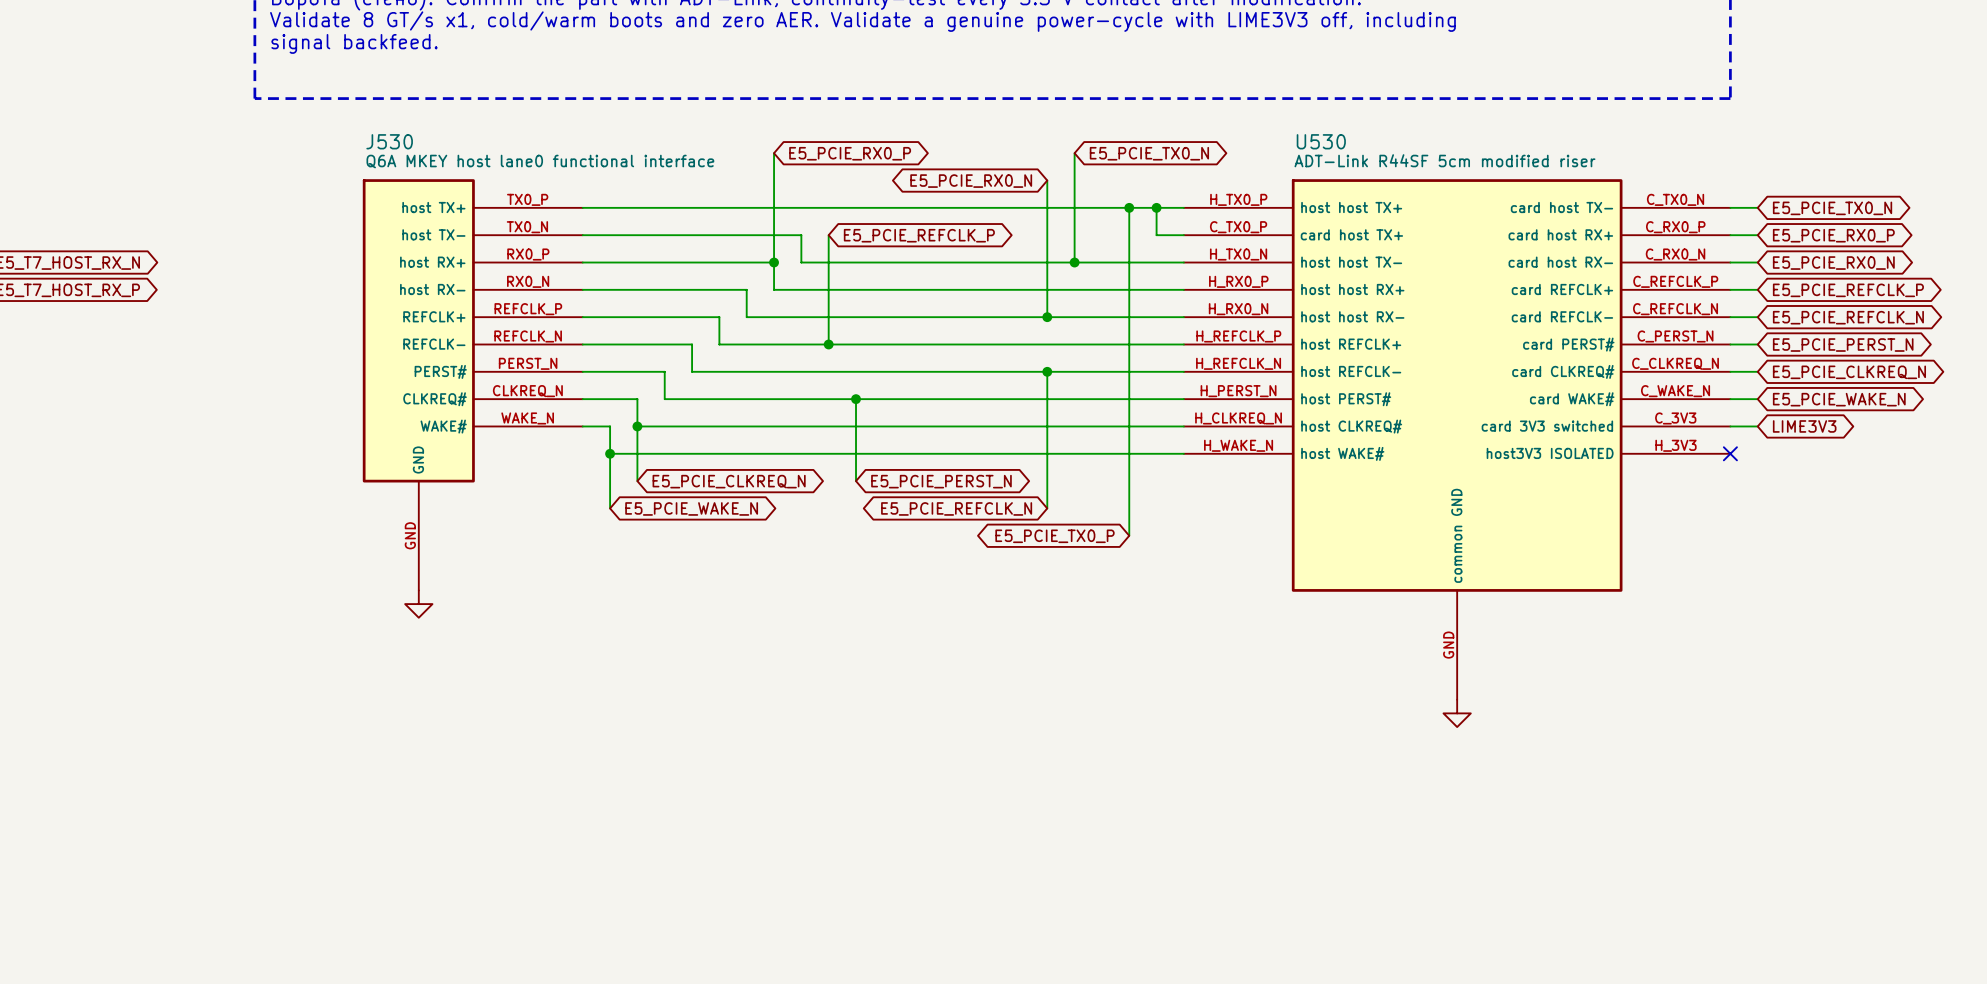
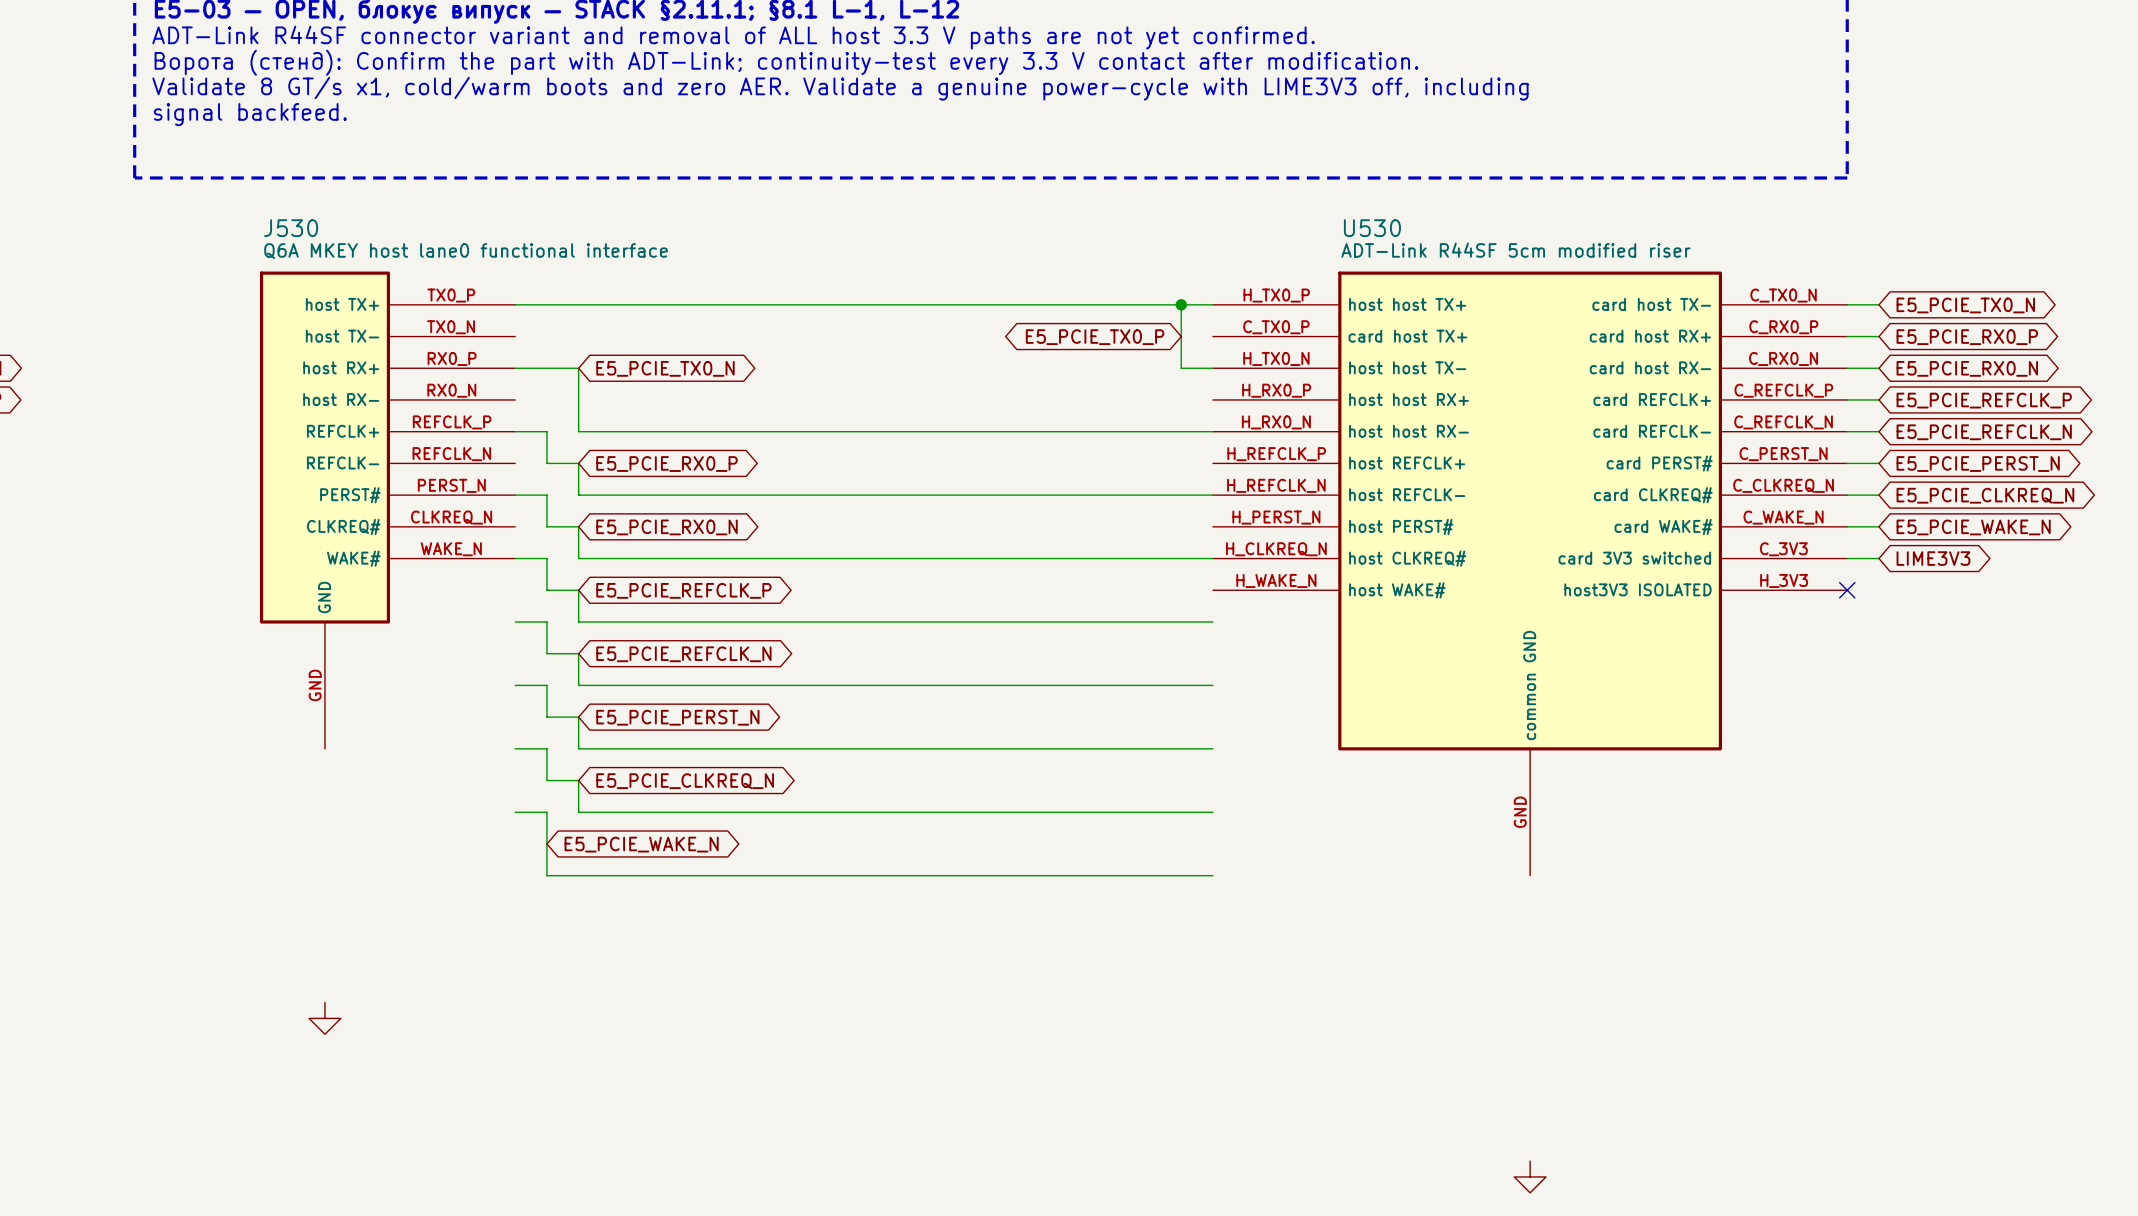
wire: (774, 153) (774, 289) (1183, 289) -> none
global label position: E5_PCIE_RX0_P (850, 153) -> E5_PCIE_RX0_P (667, 464)
wire: (1074, 153) (1074, 262) -> none
global label: E5_PCIE_TX0_N (1149, 153) -> none
wire: (1047, 180) (1047, 317) -> none
global label: E5_PCIE_RX0_N (971, 181) -> none
wire: (1129, 207) (1129, 535) -> none
junction: (1129, 207) -> none
wire: (582, 235) (801, 235) (801, 262) (1156, 262) -> none
wire: (828, 235) (828, 344) -> none
global label: E5_PCIE_REFCLK_P (919, 235) -> none
global label: none -> E5_PCIE_TX0_P (1095, 337)
wire: (1156, 235) (1183, 235) -> (1181, 336) (1181, 368)
wire: (637, 262) (774, 262) -> (578, 368) (578, 431)
junction: (774, 262) -> none
junction: (1074, 262) -> none
global label: none -> E5_PCIE_TX0_N (665, 368)
wire: (582, 289) (746, 289) (746, 317) -> (673, 431) (705, 431)
wire: (610, 317) (637, 317) -> (546, 431) (546, 463)
wire: (719, 317) (719, 344) (1183, 344) -> none
junction: (1047, 317) -> none
wire: (582, 344) (610, 344) -> none
wire: (637, 344) (692, 344) (692, 371) -> (610, 495) (642, 495)
junction: (828, 344) -> none
wire: (610, 371) (637, 371) -> (578, 463) (578, 495)
wire: (664, 371) (664, 399) (1183, 399) -> none
wire: (1047, 371) (1047, 508) -> none
junction: (1047, 371) -> none
wire: (582, 399) (610, 399) -> (546, 495) (546, 526)
global label: none -> E5_PCIE_RX0_N (667, 527)
wire: (856, 399) (856, 481) -> none
junction: (856, 399) -> none
wire: (637, 426) (637, 453) (1183, 453) -> none
junction: (637, 426) -> none
wire: (610, 453) (610, 481) -> (515, 621) (546, 621)
junction: (610, 453) -> none
global label: none -> E5_PCIE_REFCLK_P (683, 590)
wire: none -> (578, 621) (1212, 621)
global label position: E5_PCIE_CLKREQ_N (729, 481) -> E5_PCIE_CLKREQ_N (685, 781)
global label position: E5_PCIE_PERST_N (941, 481) -> E5_PCIE_PERST_N (677, 717)
wire: none -> (546, 653) (578, 653) (578, 685) (1212, 685)
global label position: E5_PCIE_WAKE_N (691, 508) -> E5_PCIE_WAKE_N (641, 844)
global label: none -> E5_PCIE_REFCLK_N (683, 654)
global label: E5_PCIE_REFCLK_N (956, 508) -> none
wire: none -> (515, 685) (546, 685) (546, 717) (578, 717) (578, 748) (1212, 748)
global label: E5_PCIE_TX0_P (1054, 536) -> none
wire: none -> (515, 748) (546, 748) (546, 780) (578, 780) (578, 812) (1212, 812)
power symbol position: (418, 604) -> (324, 1018)
wire: none -> (515, 812) (546, 812) (546, 875) (1212, 875)
power symbol position: (1457, 713) -> (1530, 1176)

